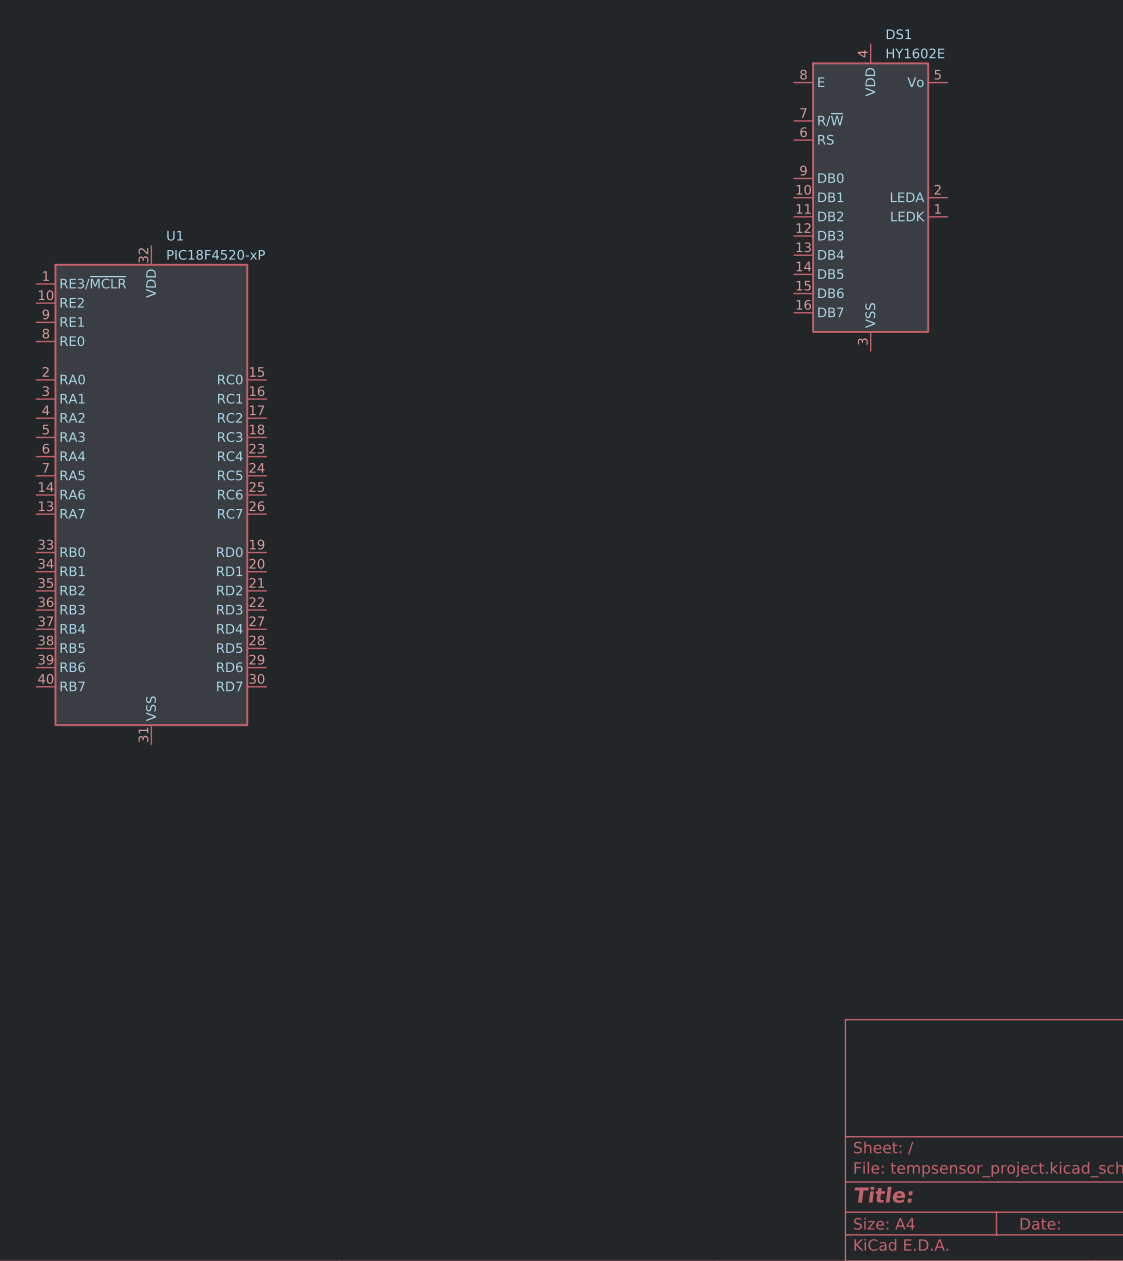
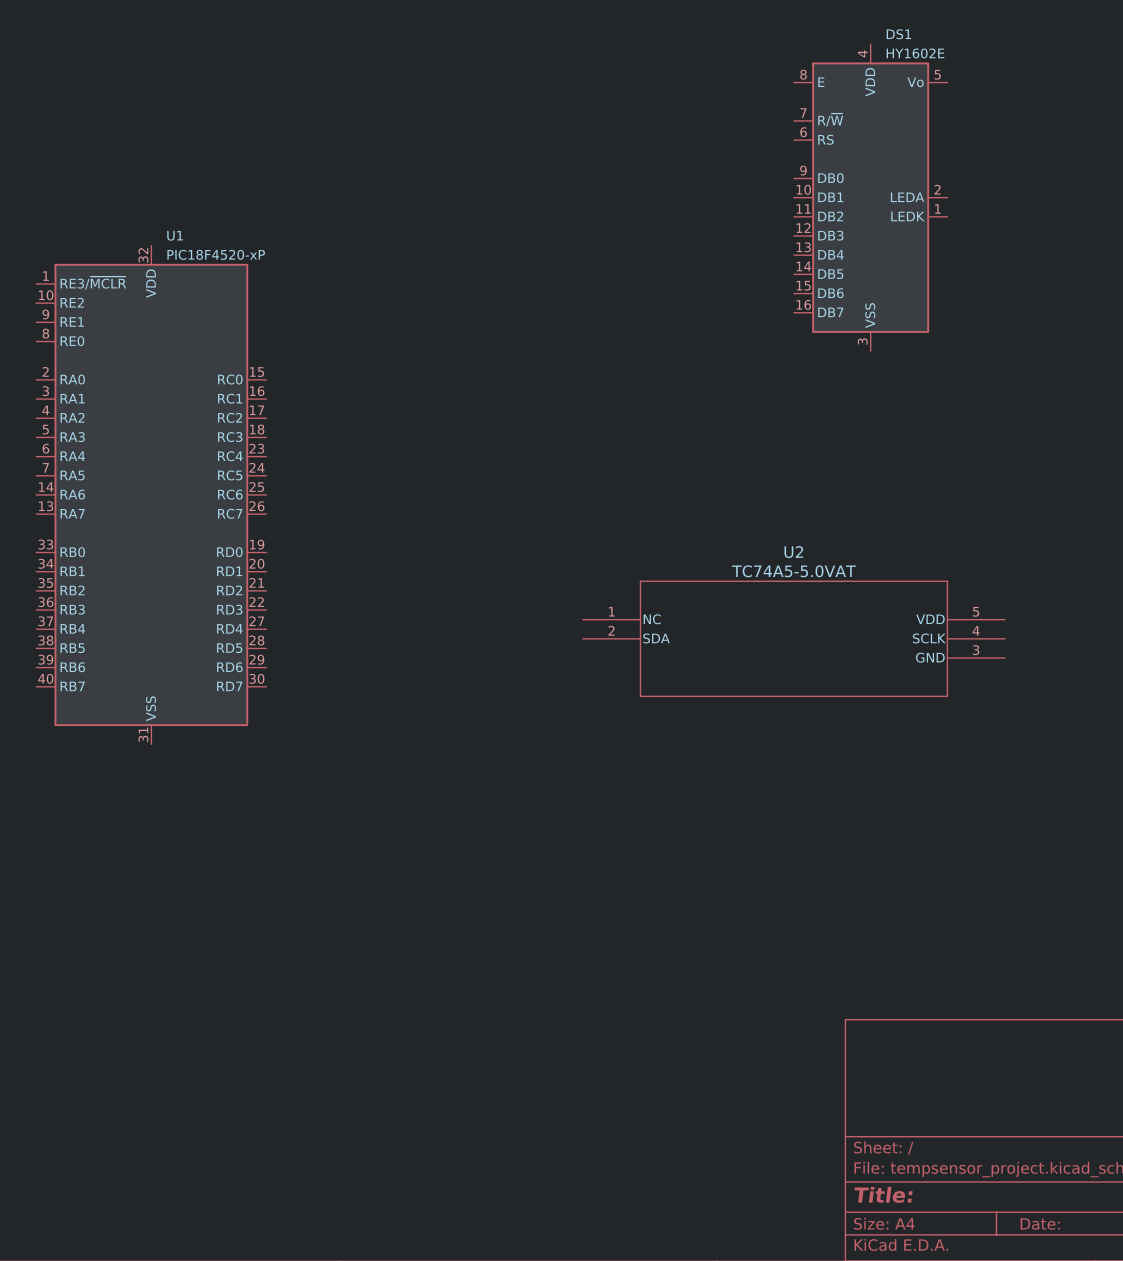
U2: none -> TC74A5-5.0VAT (793, 638)

